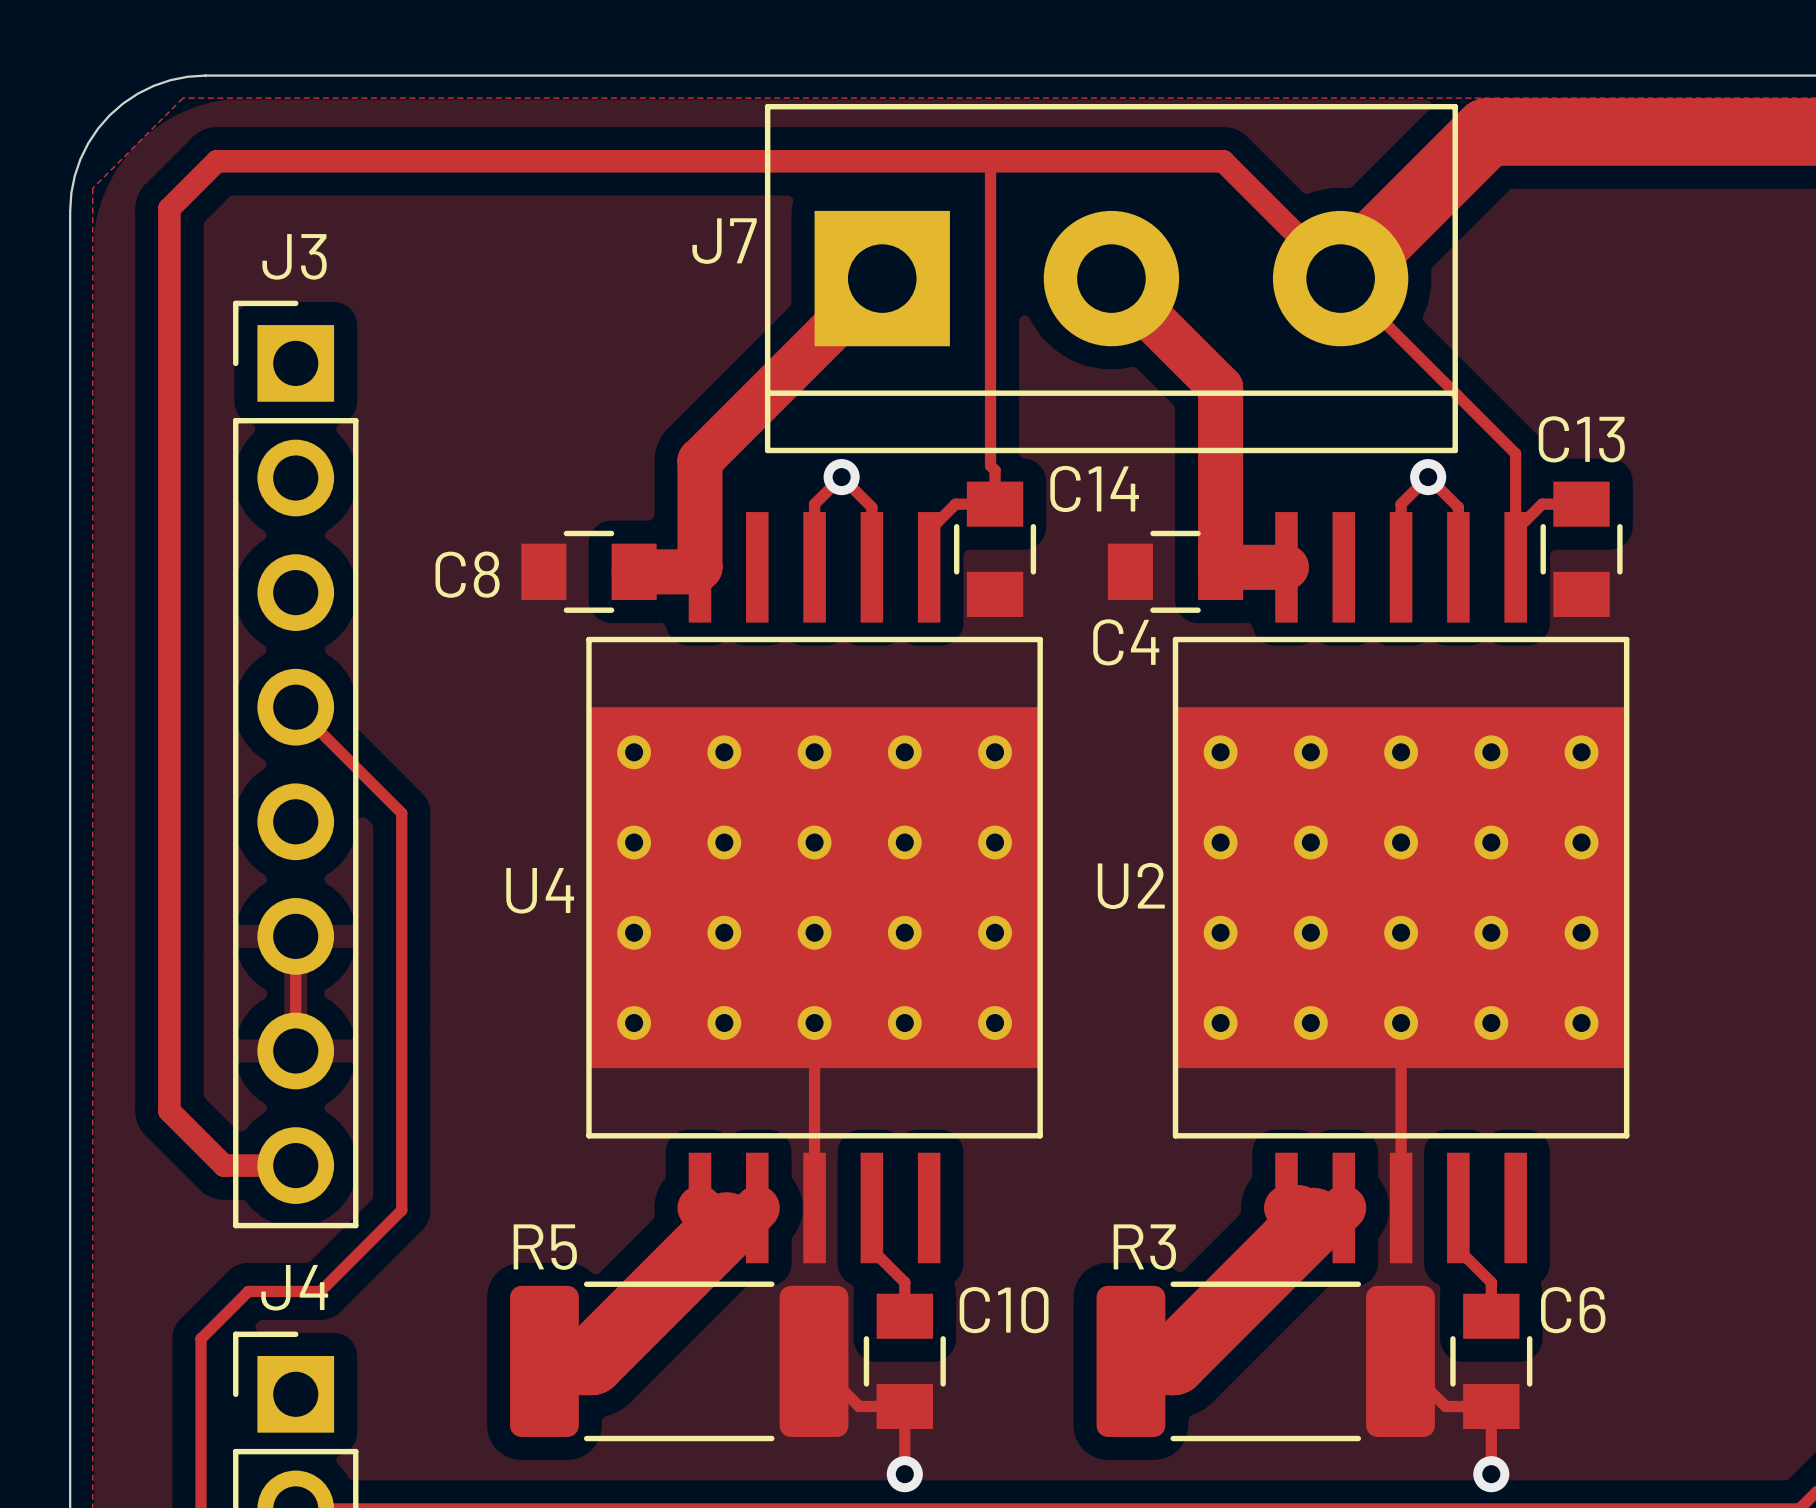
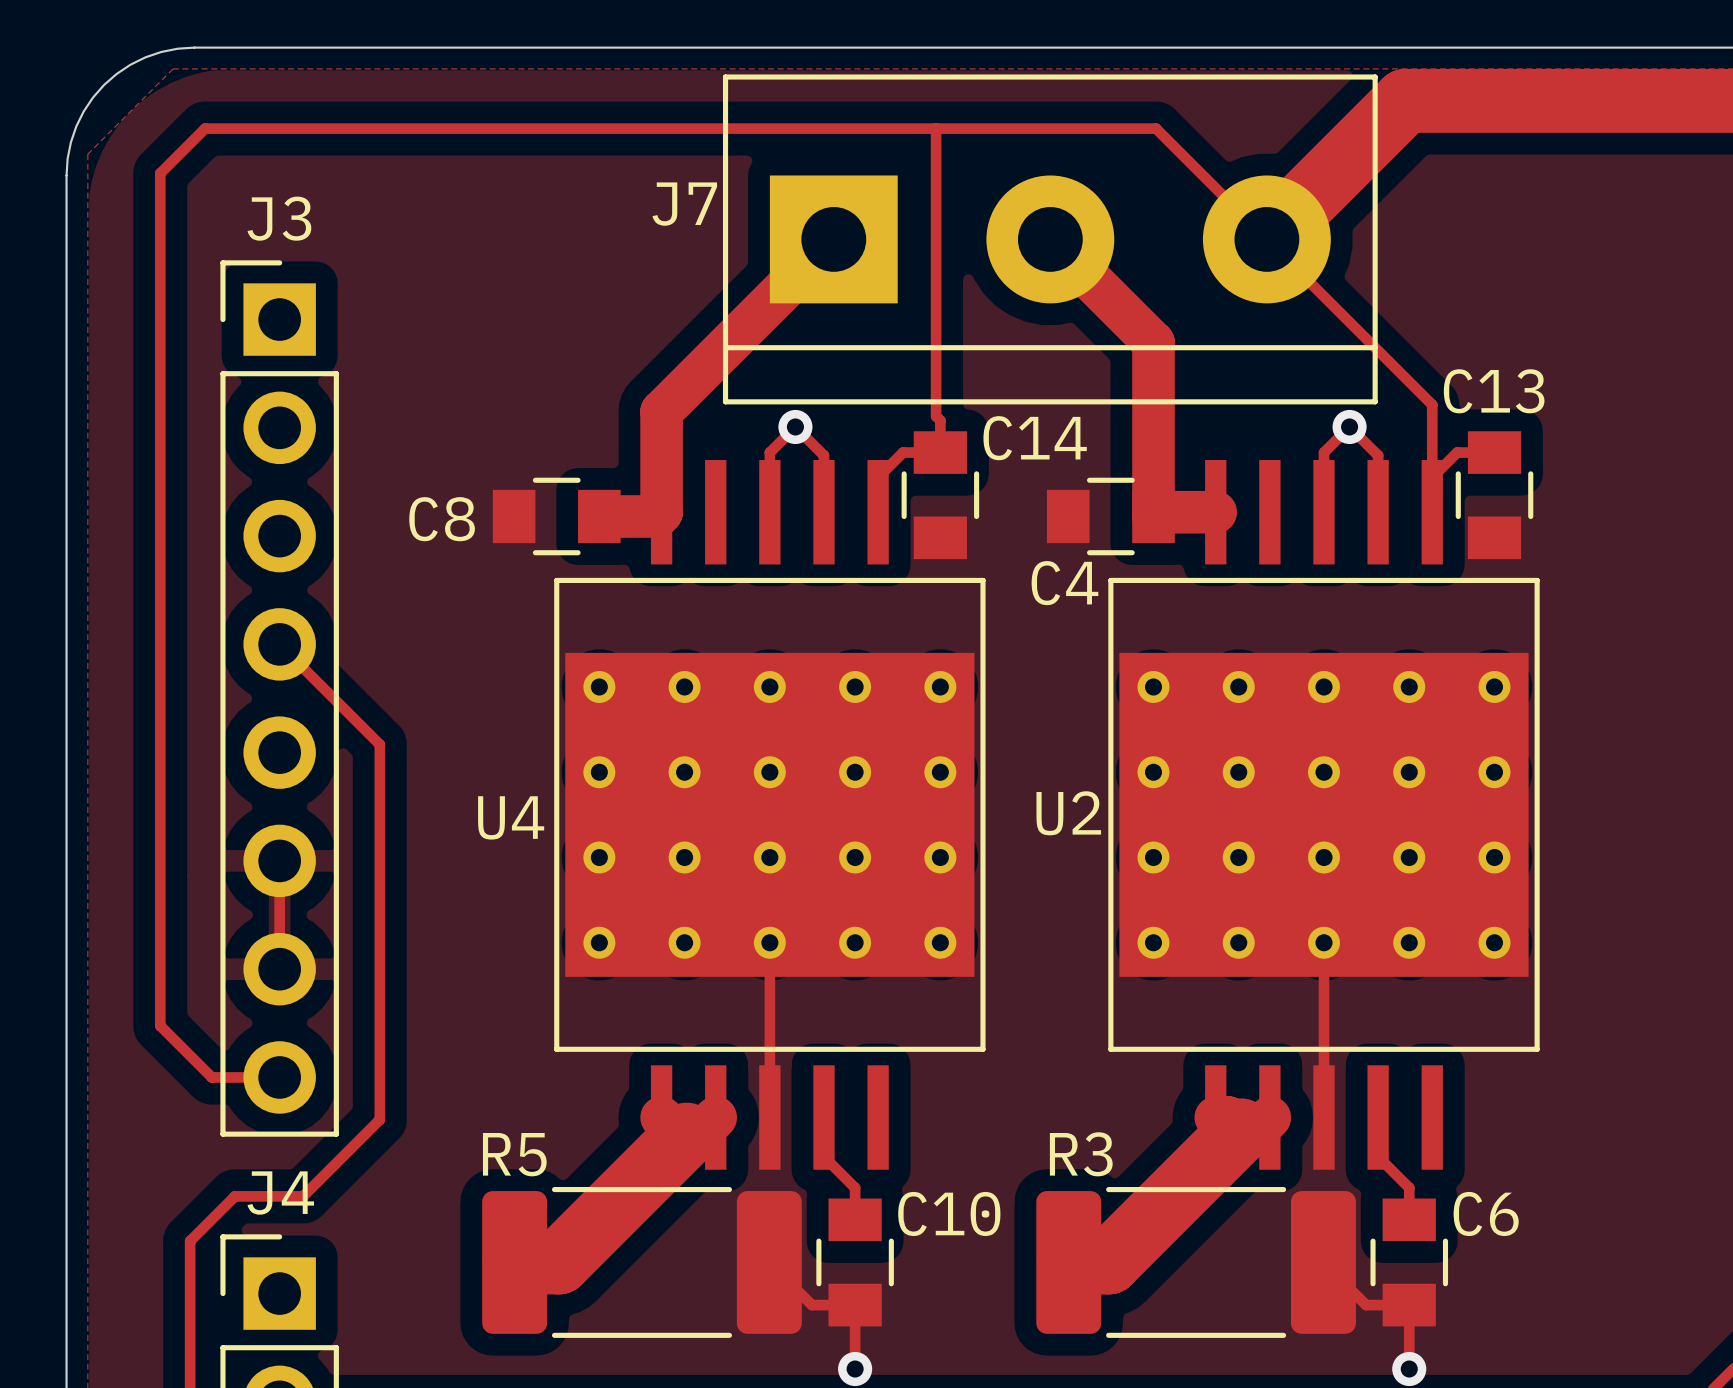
track width: thick (1340, 278) (1223, 161) (216, 161) (169, 208) (169, 1110) (224, 1165) (295, 1165) -> thin (1266, 239) (1156, 128) (205, 128) (160, 173) (160, 1025) (211, 1077) (279, 1077)
U4 footprint: [586, 512, 1043, 1264] -> [554, 460, 986, 1170]
U2 footprint: [1172, 512, 1630, 1264] -> [1108, 460, 1540, 1170]

